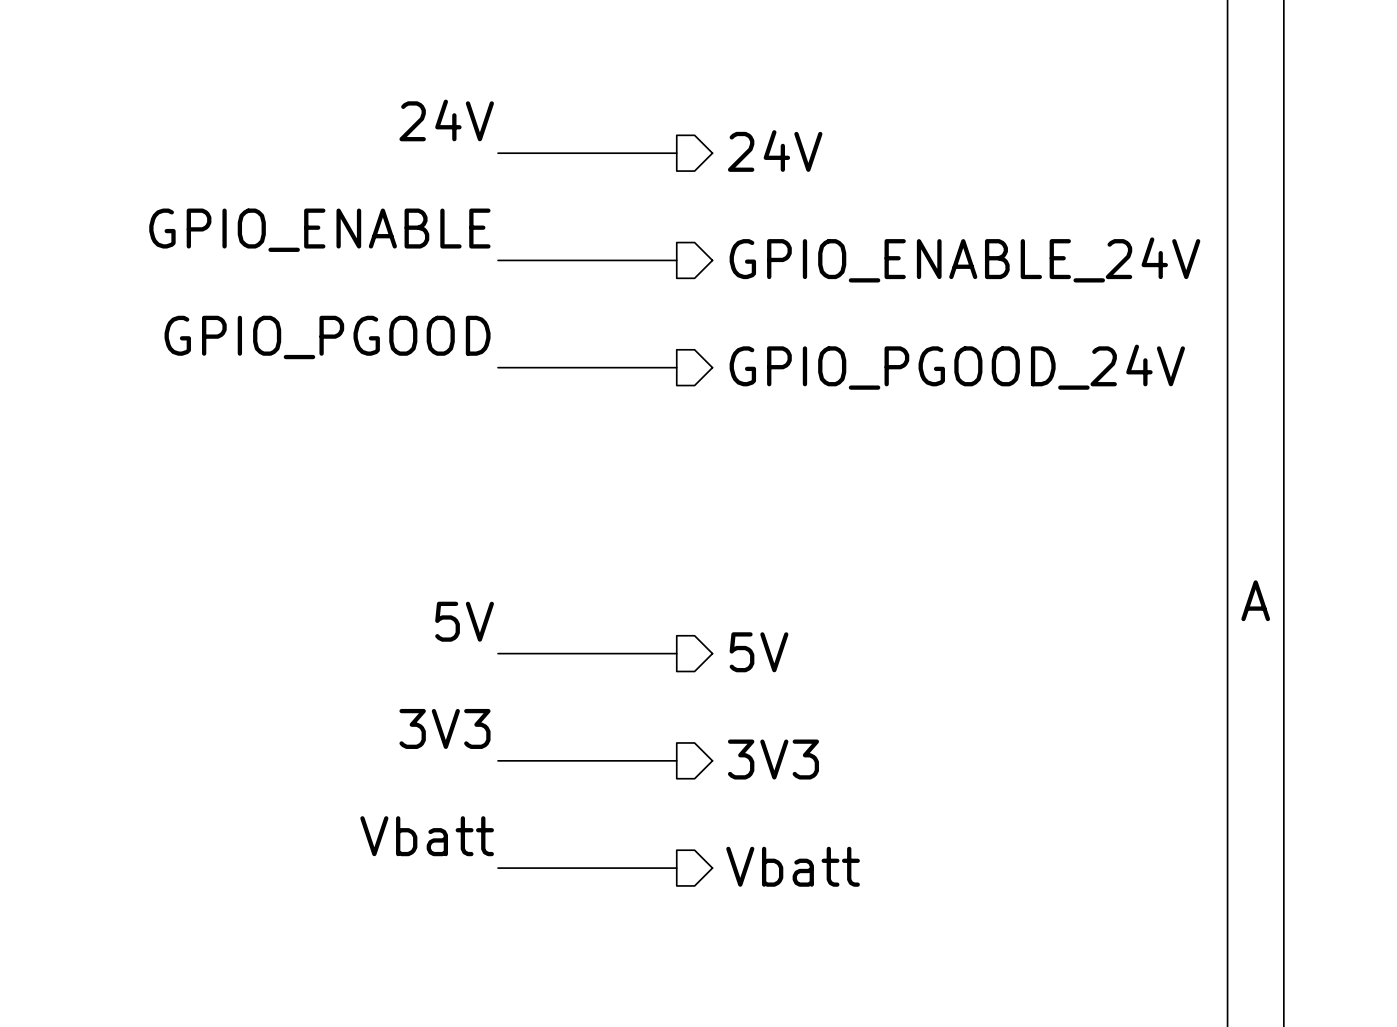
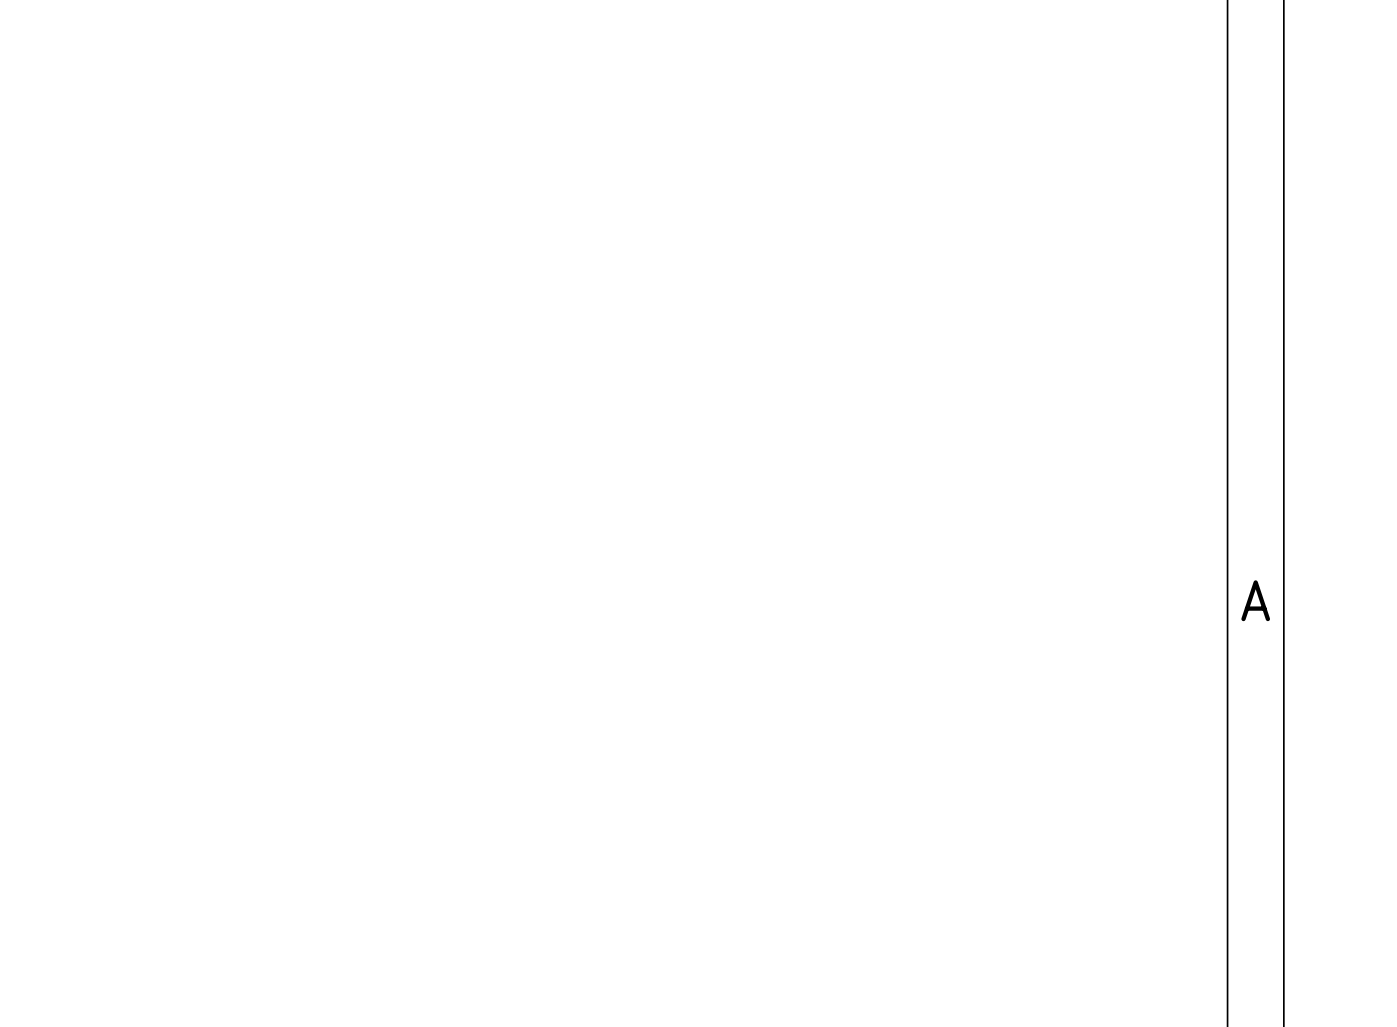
label: 24V (446, 120) -> none
hierarchical label: 24V (775, 151) -> none
wire: (498, 153) (676, 153) -> none
label: GPIO_ENABLE (319, 230) -> none
hierarchical label: GPIO_ENABLE_24V (964, 259) -> none
wire: (498, 260) (676, 260) -> none
label: GPIO_PGOOD (327, 337) -> none
wire: (498, 367) (676, 367) -> none
hierarchical label: GPIO_PGOOD_24V (957, 367) -> none
label: 5V (464, 621) -> none
hierarchical label: 5V (759, 652) -> none
wire: (498, 653) (676, 653) -> none
label: 3V3 (444, 728) -> none
hierarchical label: 3V3 (773, 759) -> none
wire: (498, 760) (676, 760) -> none
label: Vbatt (427, 836) -> none
hierarchical label: Vbatt (793, 866) -> none
wire: (498, 868) (676, 868) -> none

